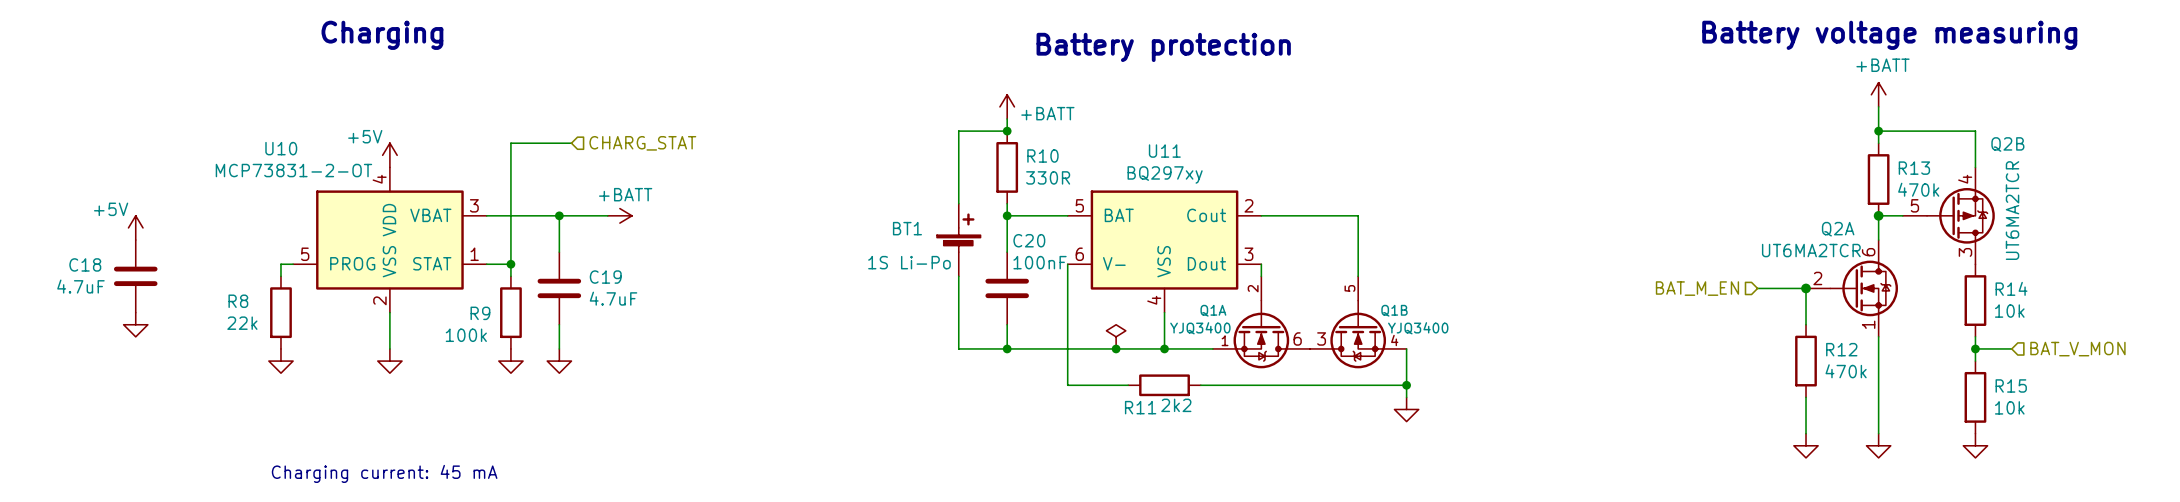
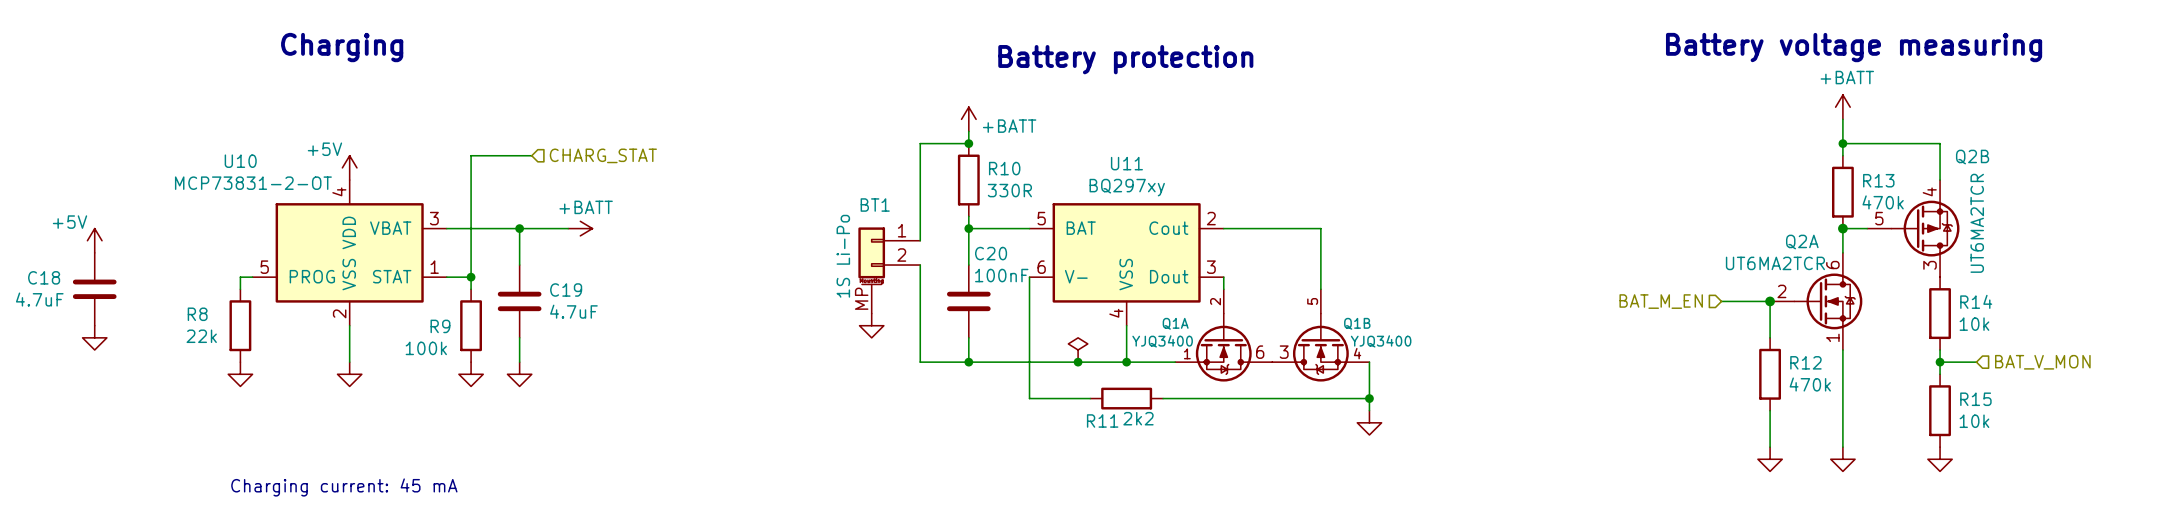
BT1 symbol: [936, 203, 981, 277] -> [858, 227, 921, 314]
BT1 name position: BT1 (907, 228) -> BT1 (875, 205)
BT1 value position: 1S Li-Po (909, 262) -> 1S Li-Po (843, 256)
power symbol: none -> (871, 325)

